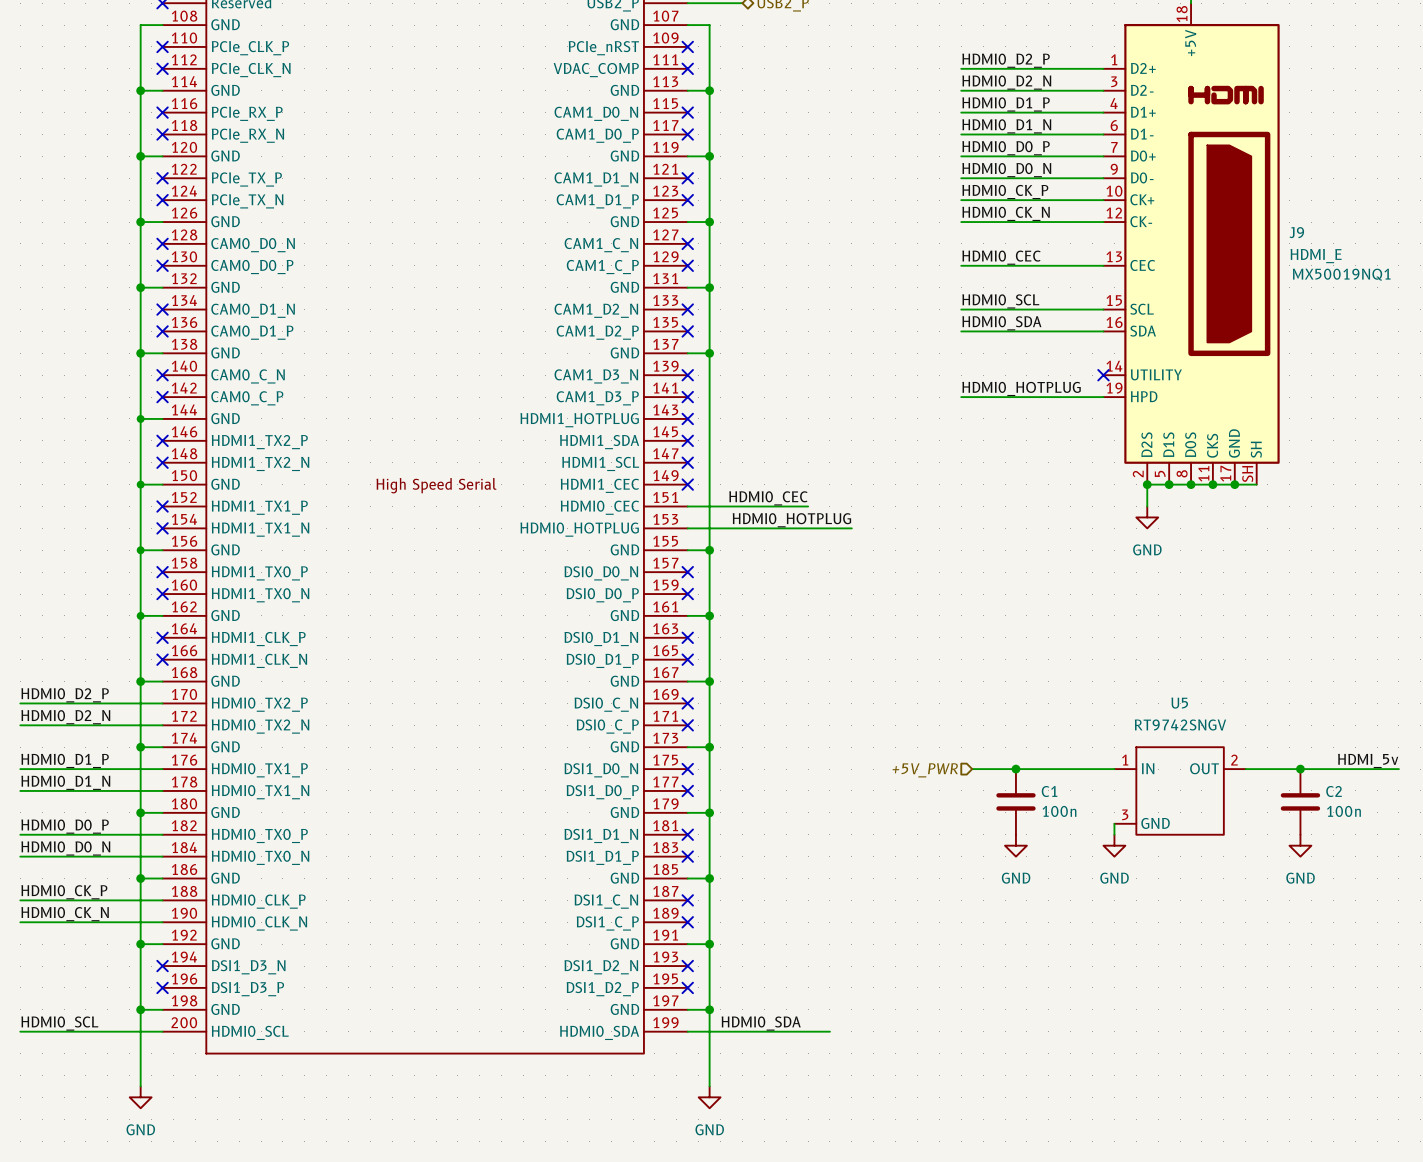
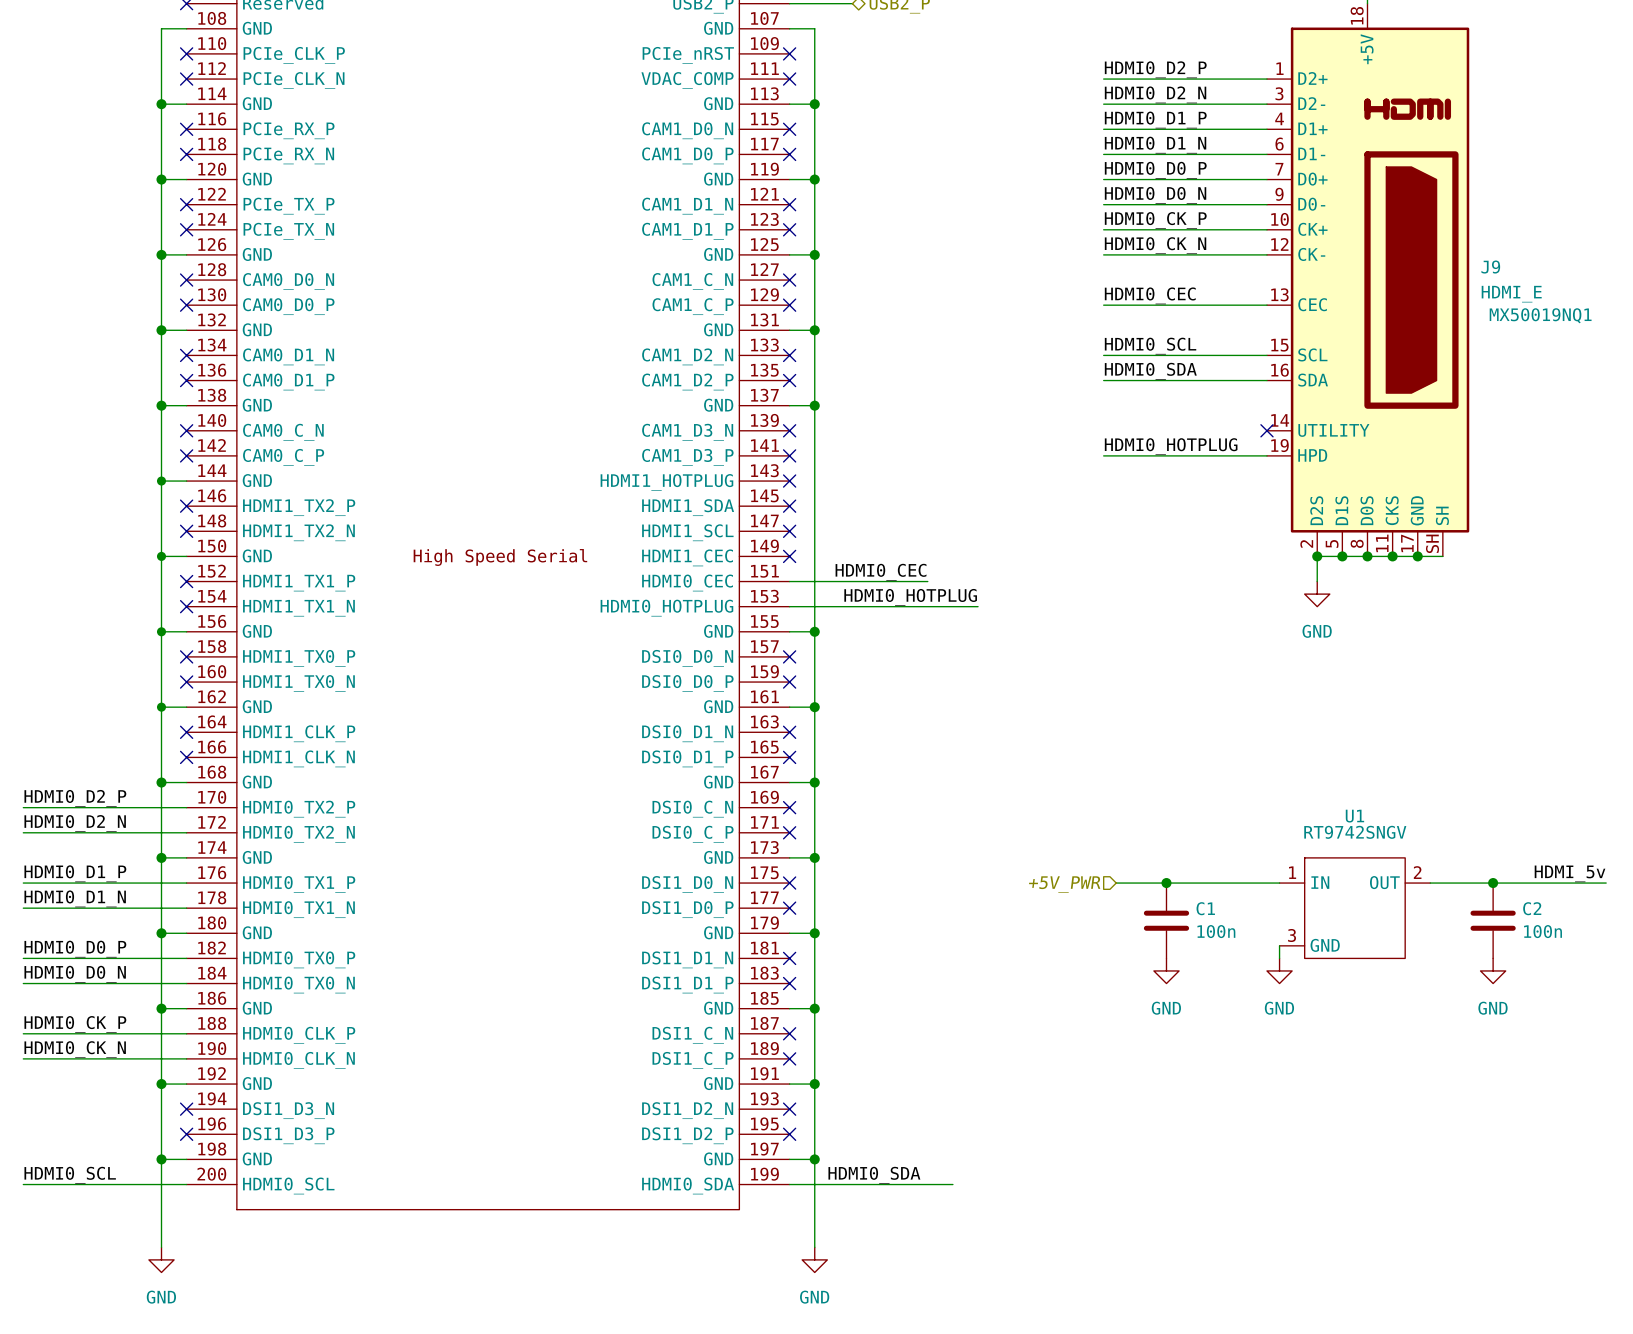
U5 name: U5 (1179, 703) -> U1 (1354, 816)

